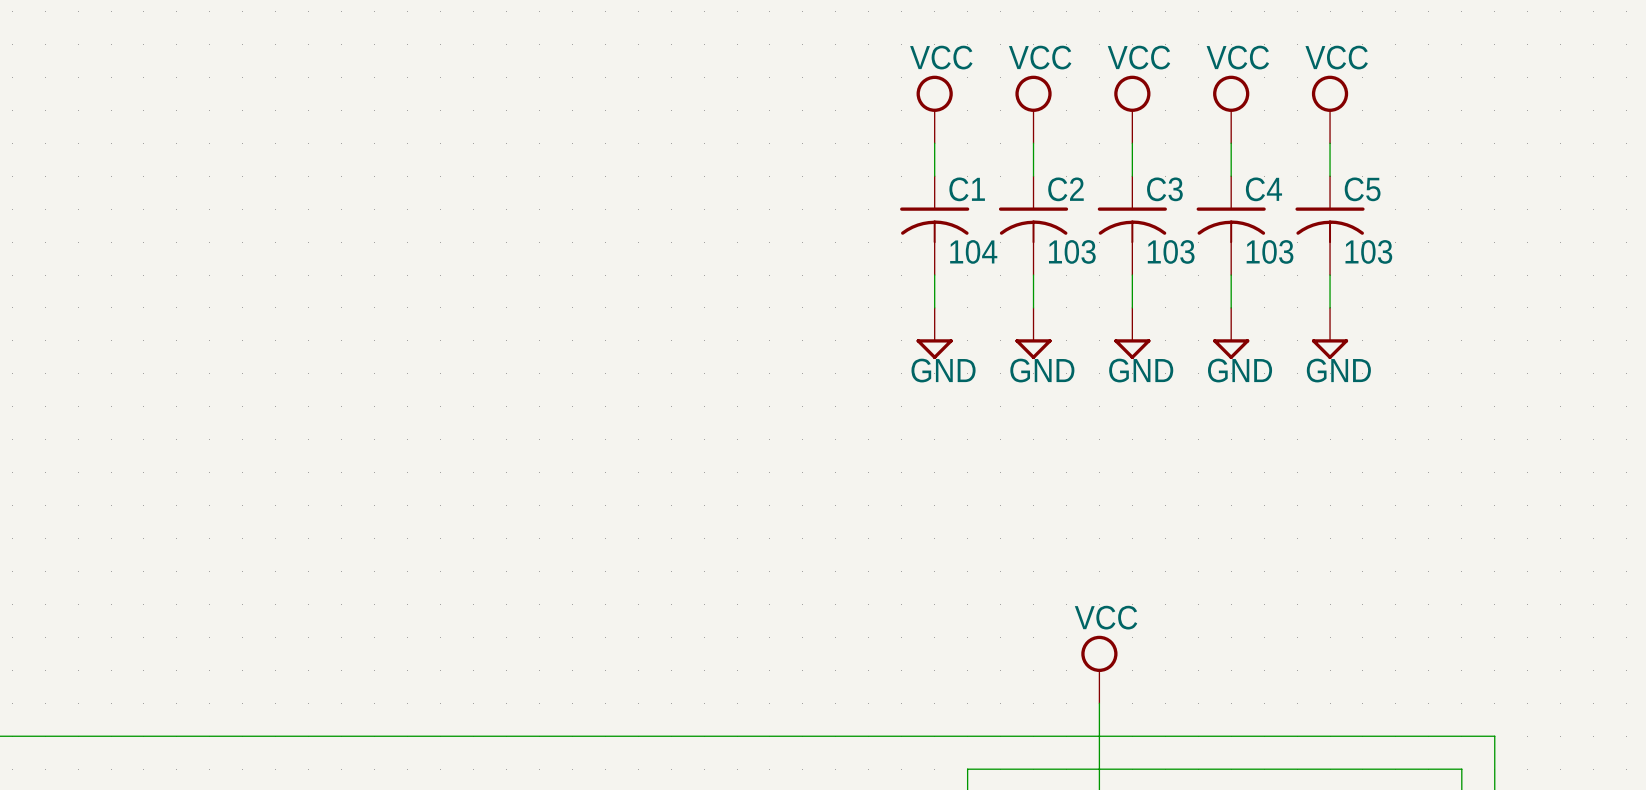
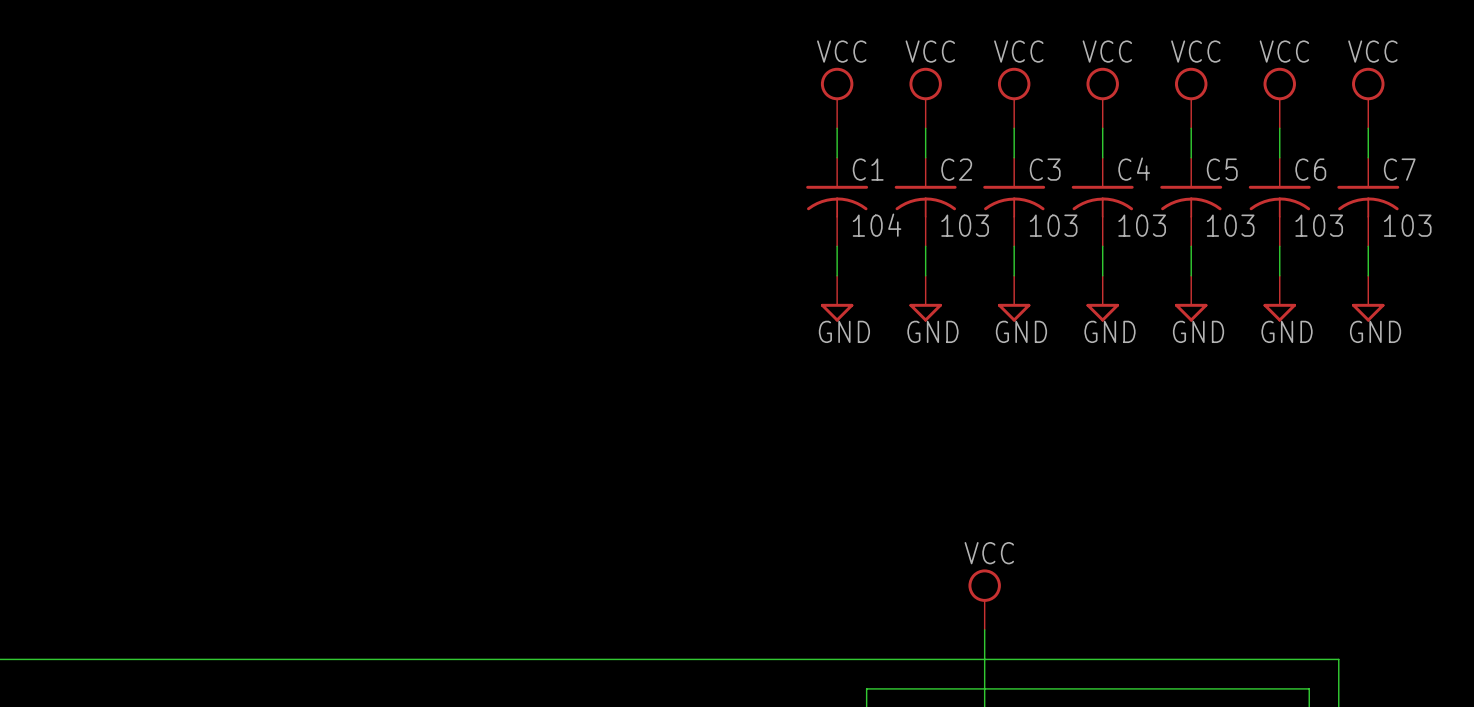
power symbol: none -> VCC (1279, 98)
power symbol: none -> VCC (1368, 98)
wire: none -> (1279, 128) (1279, 157)
wire: none -> (1368, 128) (1368, 157)
C6: none -> 103 (1279, 202)
C7: none -> 103 (1368, 202)
wire: none -> (1279, 246) (1279, 275)
wire: none -> (1368, 246) (1368, 275)
power symbol: none -> GND (1279, 298)
power symbol: none -> GND (1368, 298)

